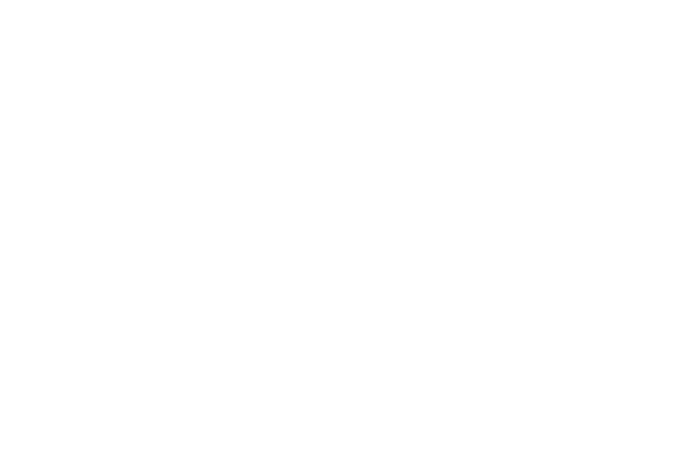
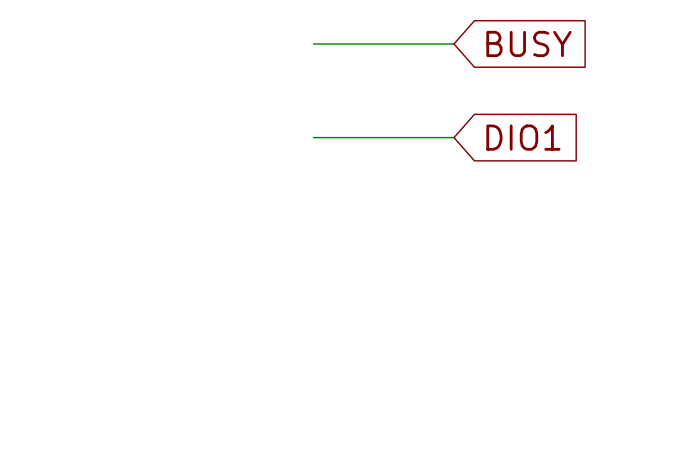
wire: none -> (313, 43) (454, 43)
global label: none -> BUSY (529, 43)
wire: none -> (313, 137) (454, 137)
global label: none -> DIO1 (523, 137)

